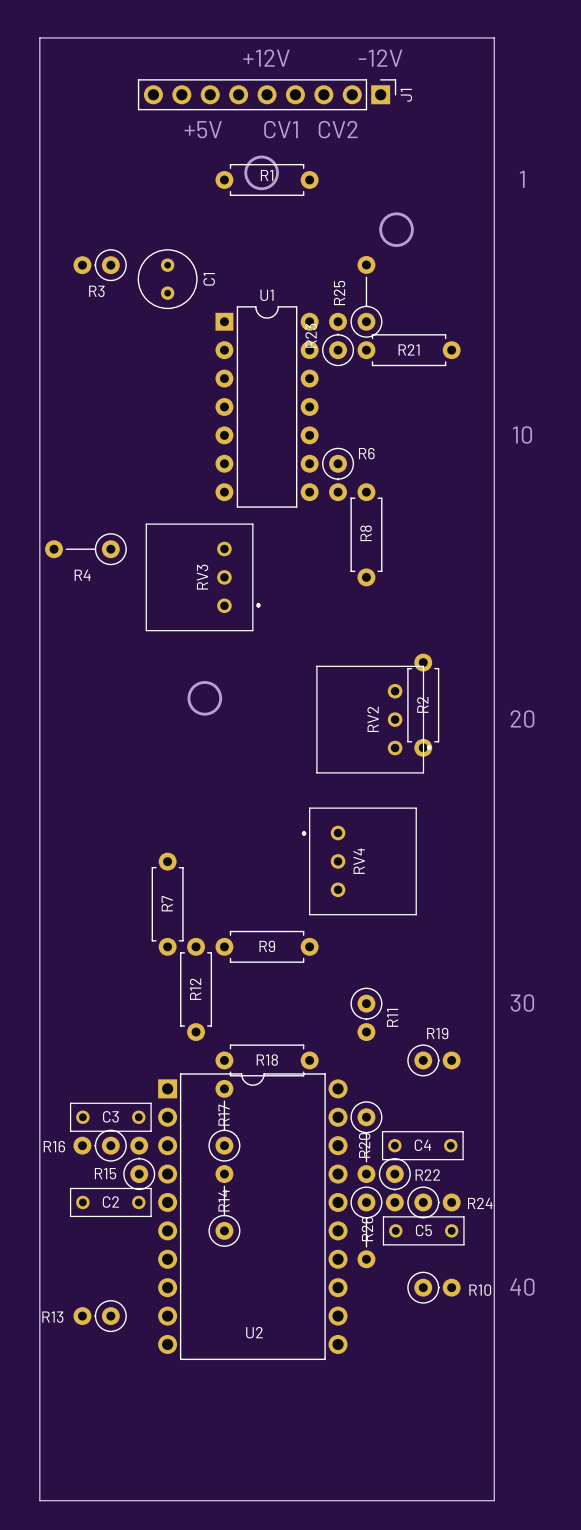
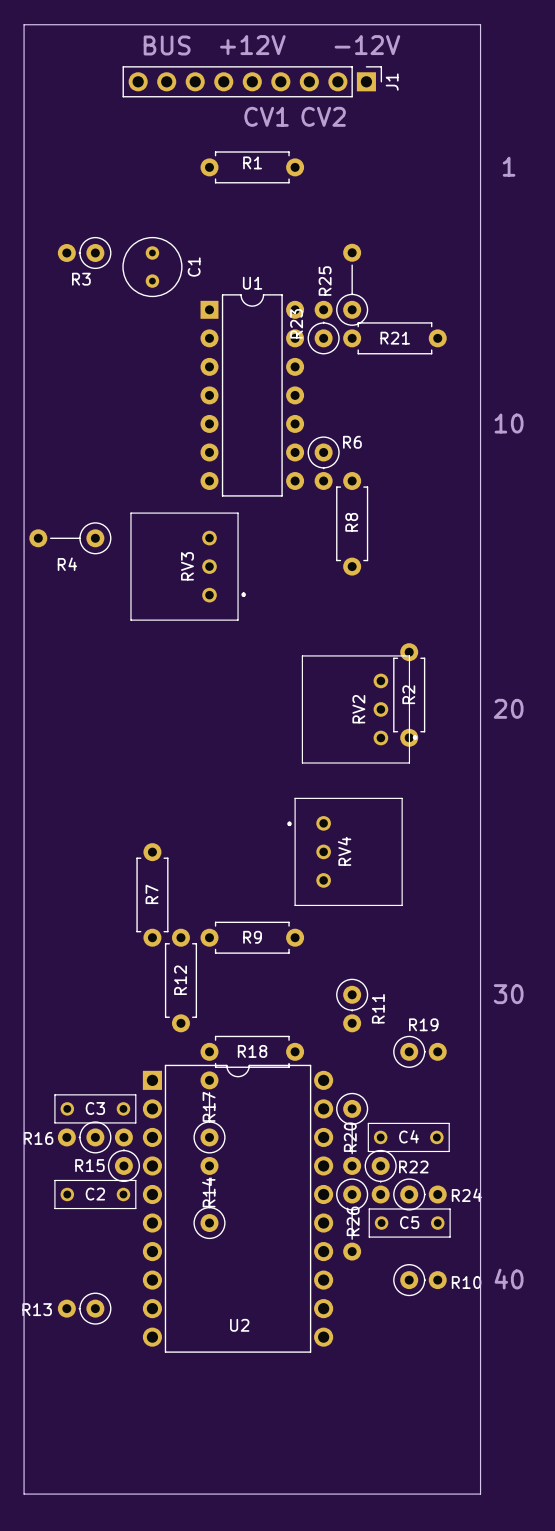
text: none -> BUS (167, 45)
text: +5V (203, 129) -> none
drawing: [244, 155, 279, 191] -> none
drawing: [379, 212, 414, 247] -> none
drawing: [187, 681, 223, 716] -> none

